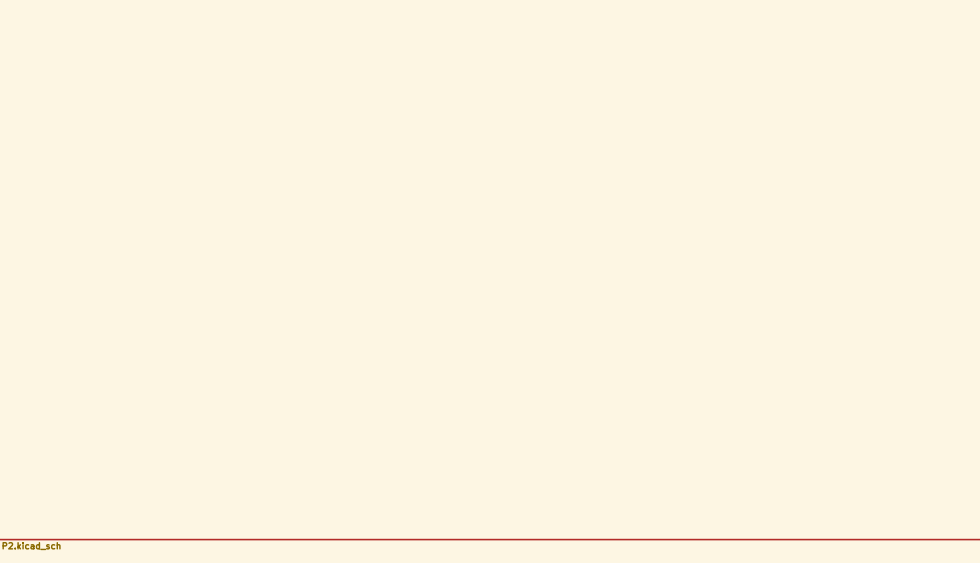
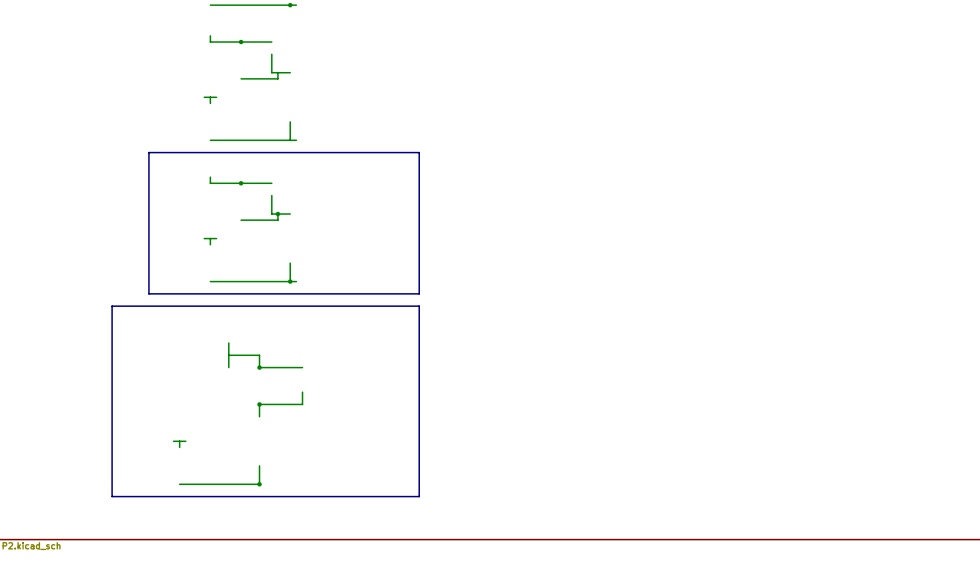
wire: none -> (210, 5) (296, 5)
junction: none -> (290, 5)
wire: none -> (210, 35) (210, 42) (271, 42)
junction: none -> (241, 42)
wire: none -> (271, 54) (271, 72) (290, 72)
wire: none -> (277, 72) (277, 78) (241, 78)
wire: none -> (204, 97) (216, 97)
wire: none -> (210, 97) (210, 103)
wire: none -> (290, 121) (290, 140)
wire: none -> (210, 140) (296, 140)
line: none -> (148, 152) (419, 152) (419, 293) (148, 293) (148, 152)
wire: none -> (210, 177) (210, 183) (271, 183)
junction: none -> (241, 183)
wire: none -> (271, 195) (271, 214) (290, 214)
wire: none -> (277, 214) (277, 220) (241, 220)
junction: none -> (277, 214)
wire: none -> (204, 238) (216, 238)
wire: none -> (210, 238) (210, 244)
wire: none -> (290, 263) (290, 281)
wire: none -> (210, 281) (296, 281)
junction: none -> (290, 281)
line: none -> (112, 306) (419, 306) (419, 496) (112, 496) (112, 306)
wire: none -> (228, 343) (228, 367)
wire: none -> (228, 355) (259, 355) (259, 367) (302, 367)
junction: none -> (259, 367)
wire: none -> (302, 392) (302, 404) (259, 404) (259, 416)
junction: none -> (259, 404)
wire: none -> (173, 441) (185, 441)
wire: none -> (179, 441) (179, 447)
wire: none -> (259, 465) (259, 484) (179, 484)
junction: none -> (259, 484)

